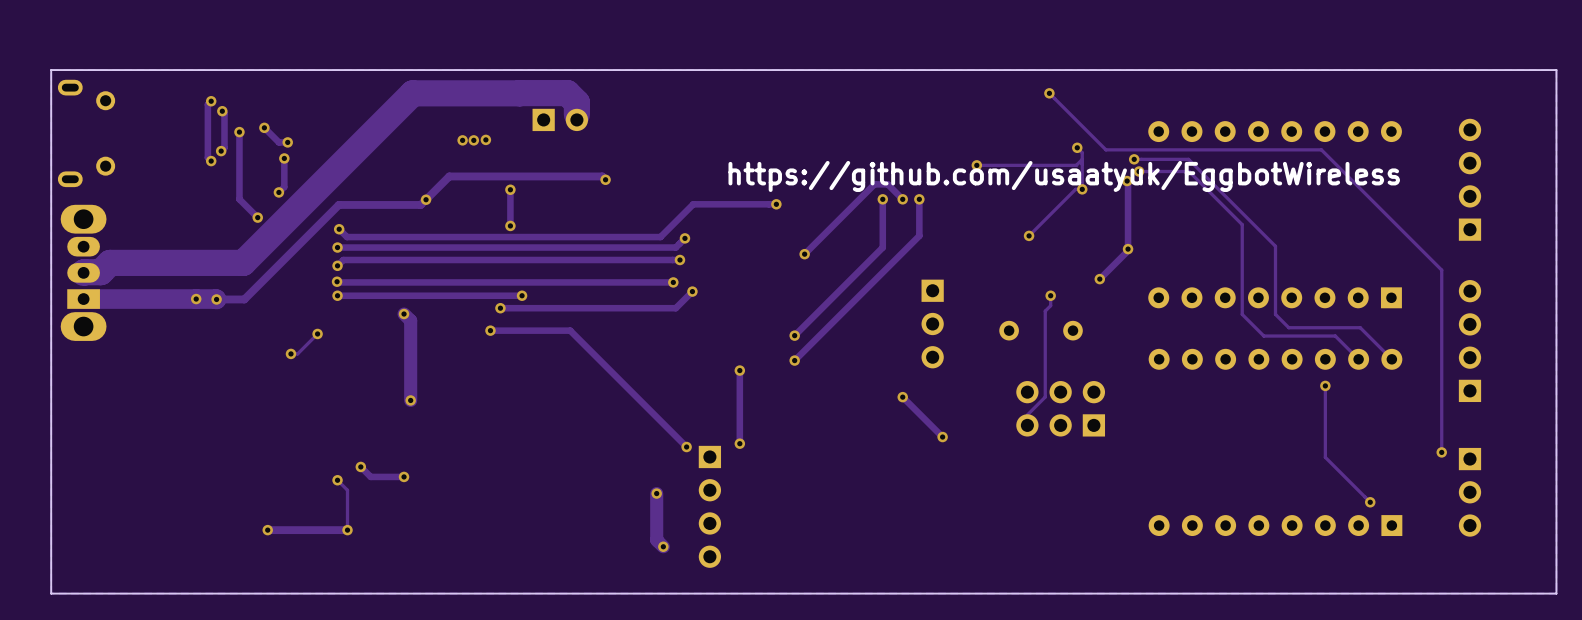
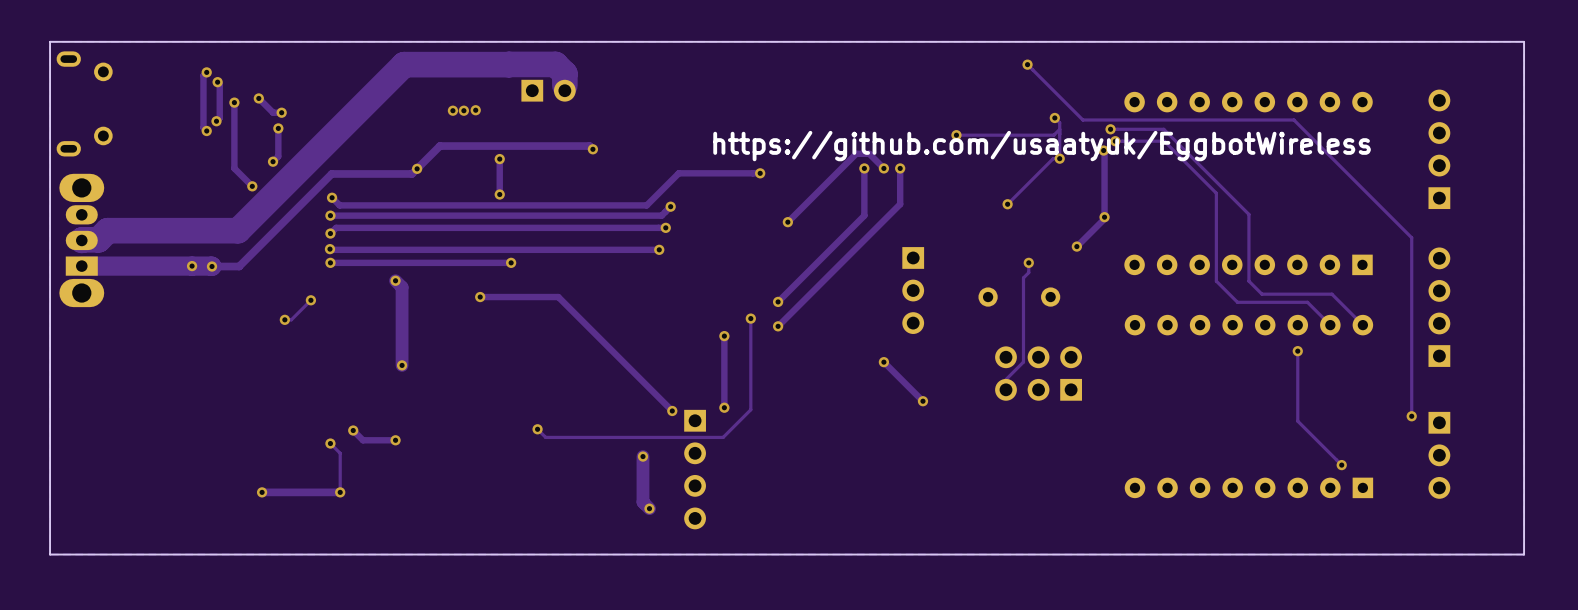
track: (692, 291) (675, 308) (500, 308) -> none
via: (692, 291) -> none
via: (500, 308) -> none
track: none -> (750, 318) (750, 409) (723, 437) (545, 437) (537, 429)
via: none -> (750, 318)
via: none -> (537, 429)

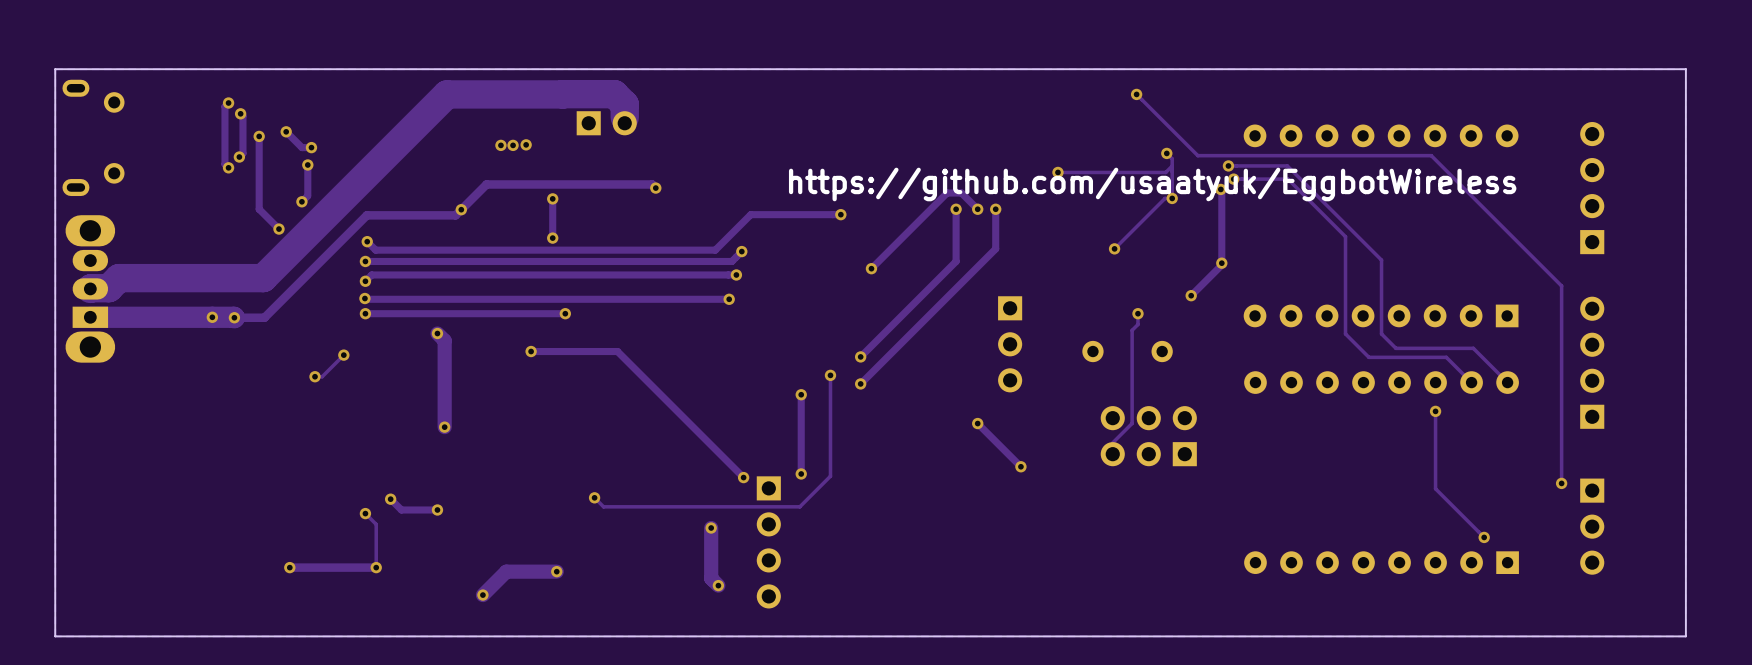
track: none -> (556, 571) (506, 571) (482, 595)
via: none -> (556, 571)
via: none -> (482, 595)

